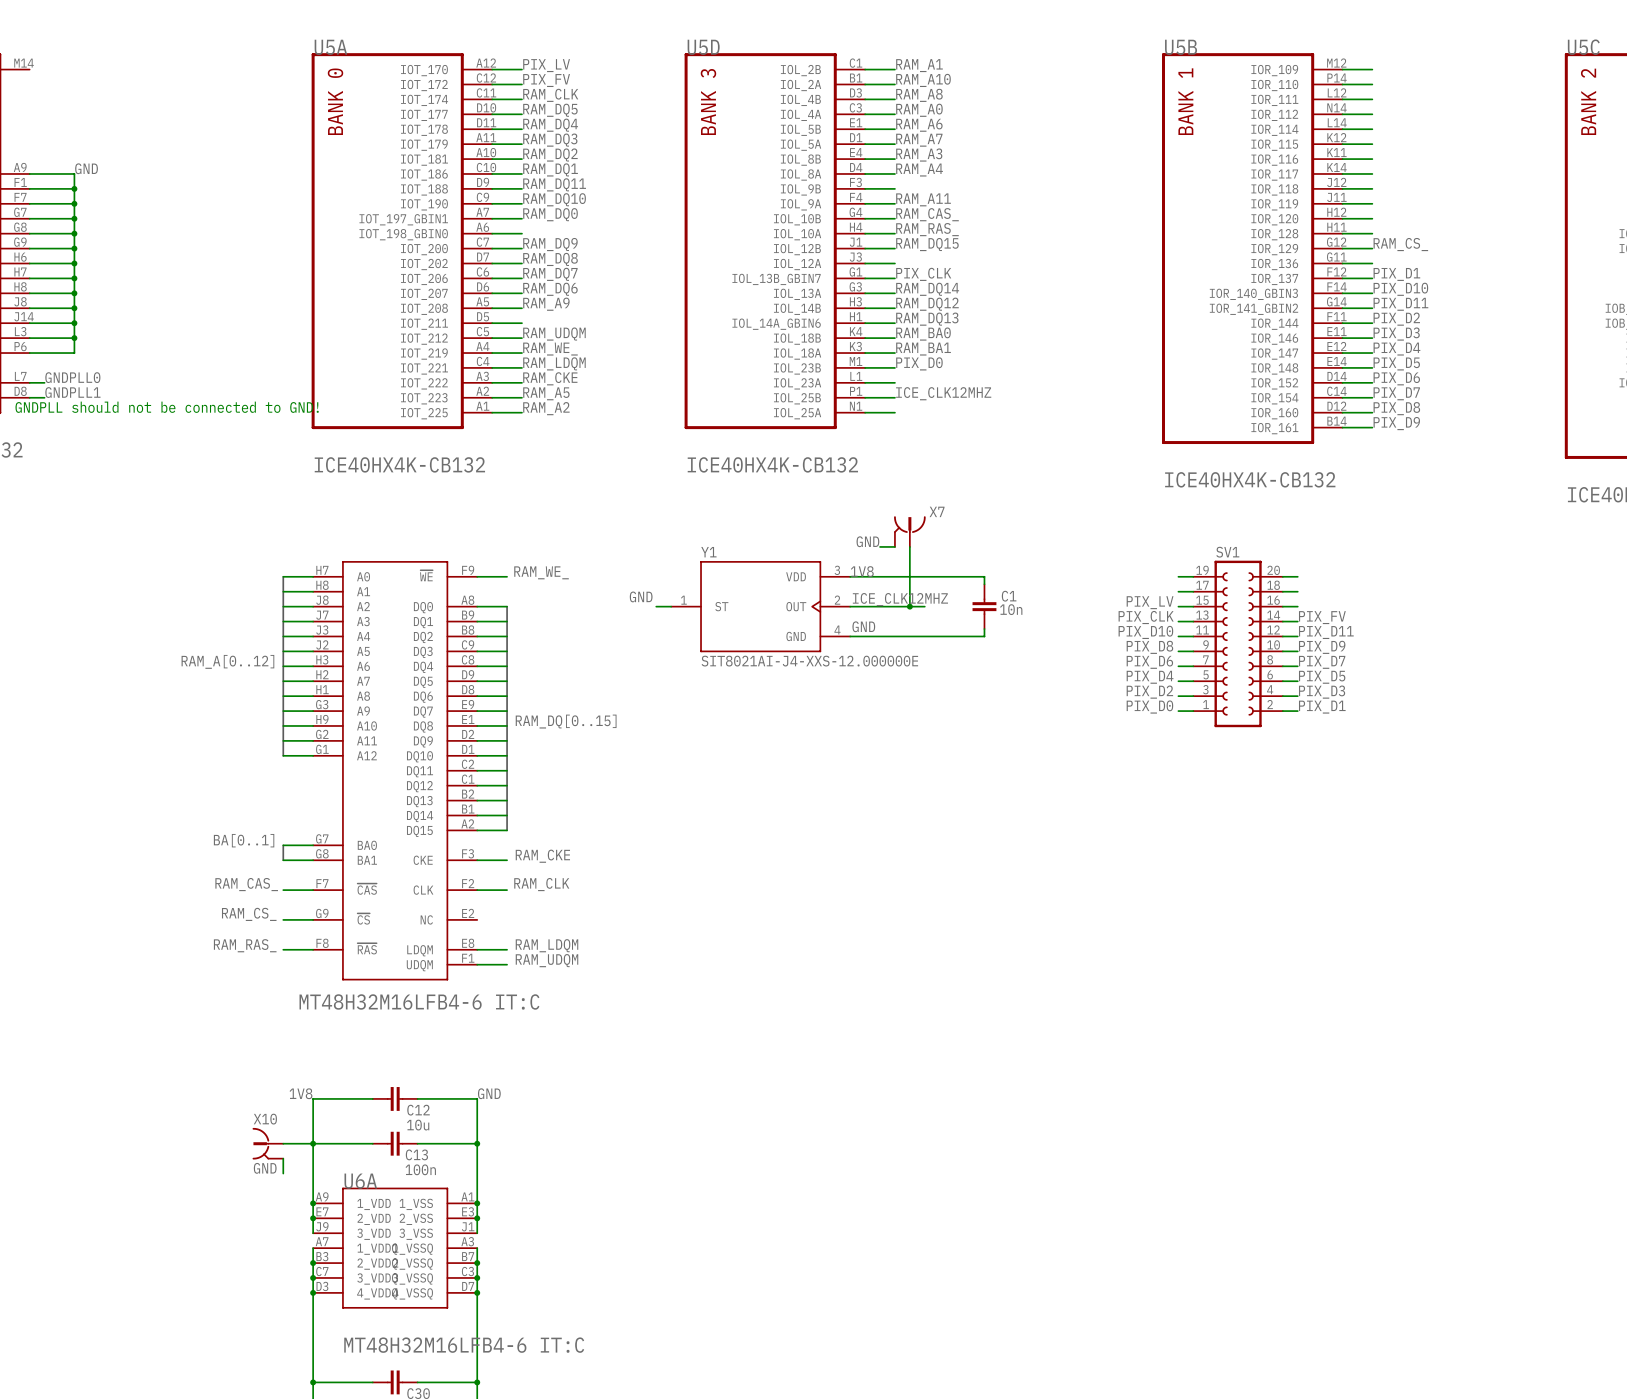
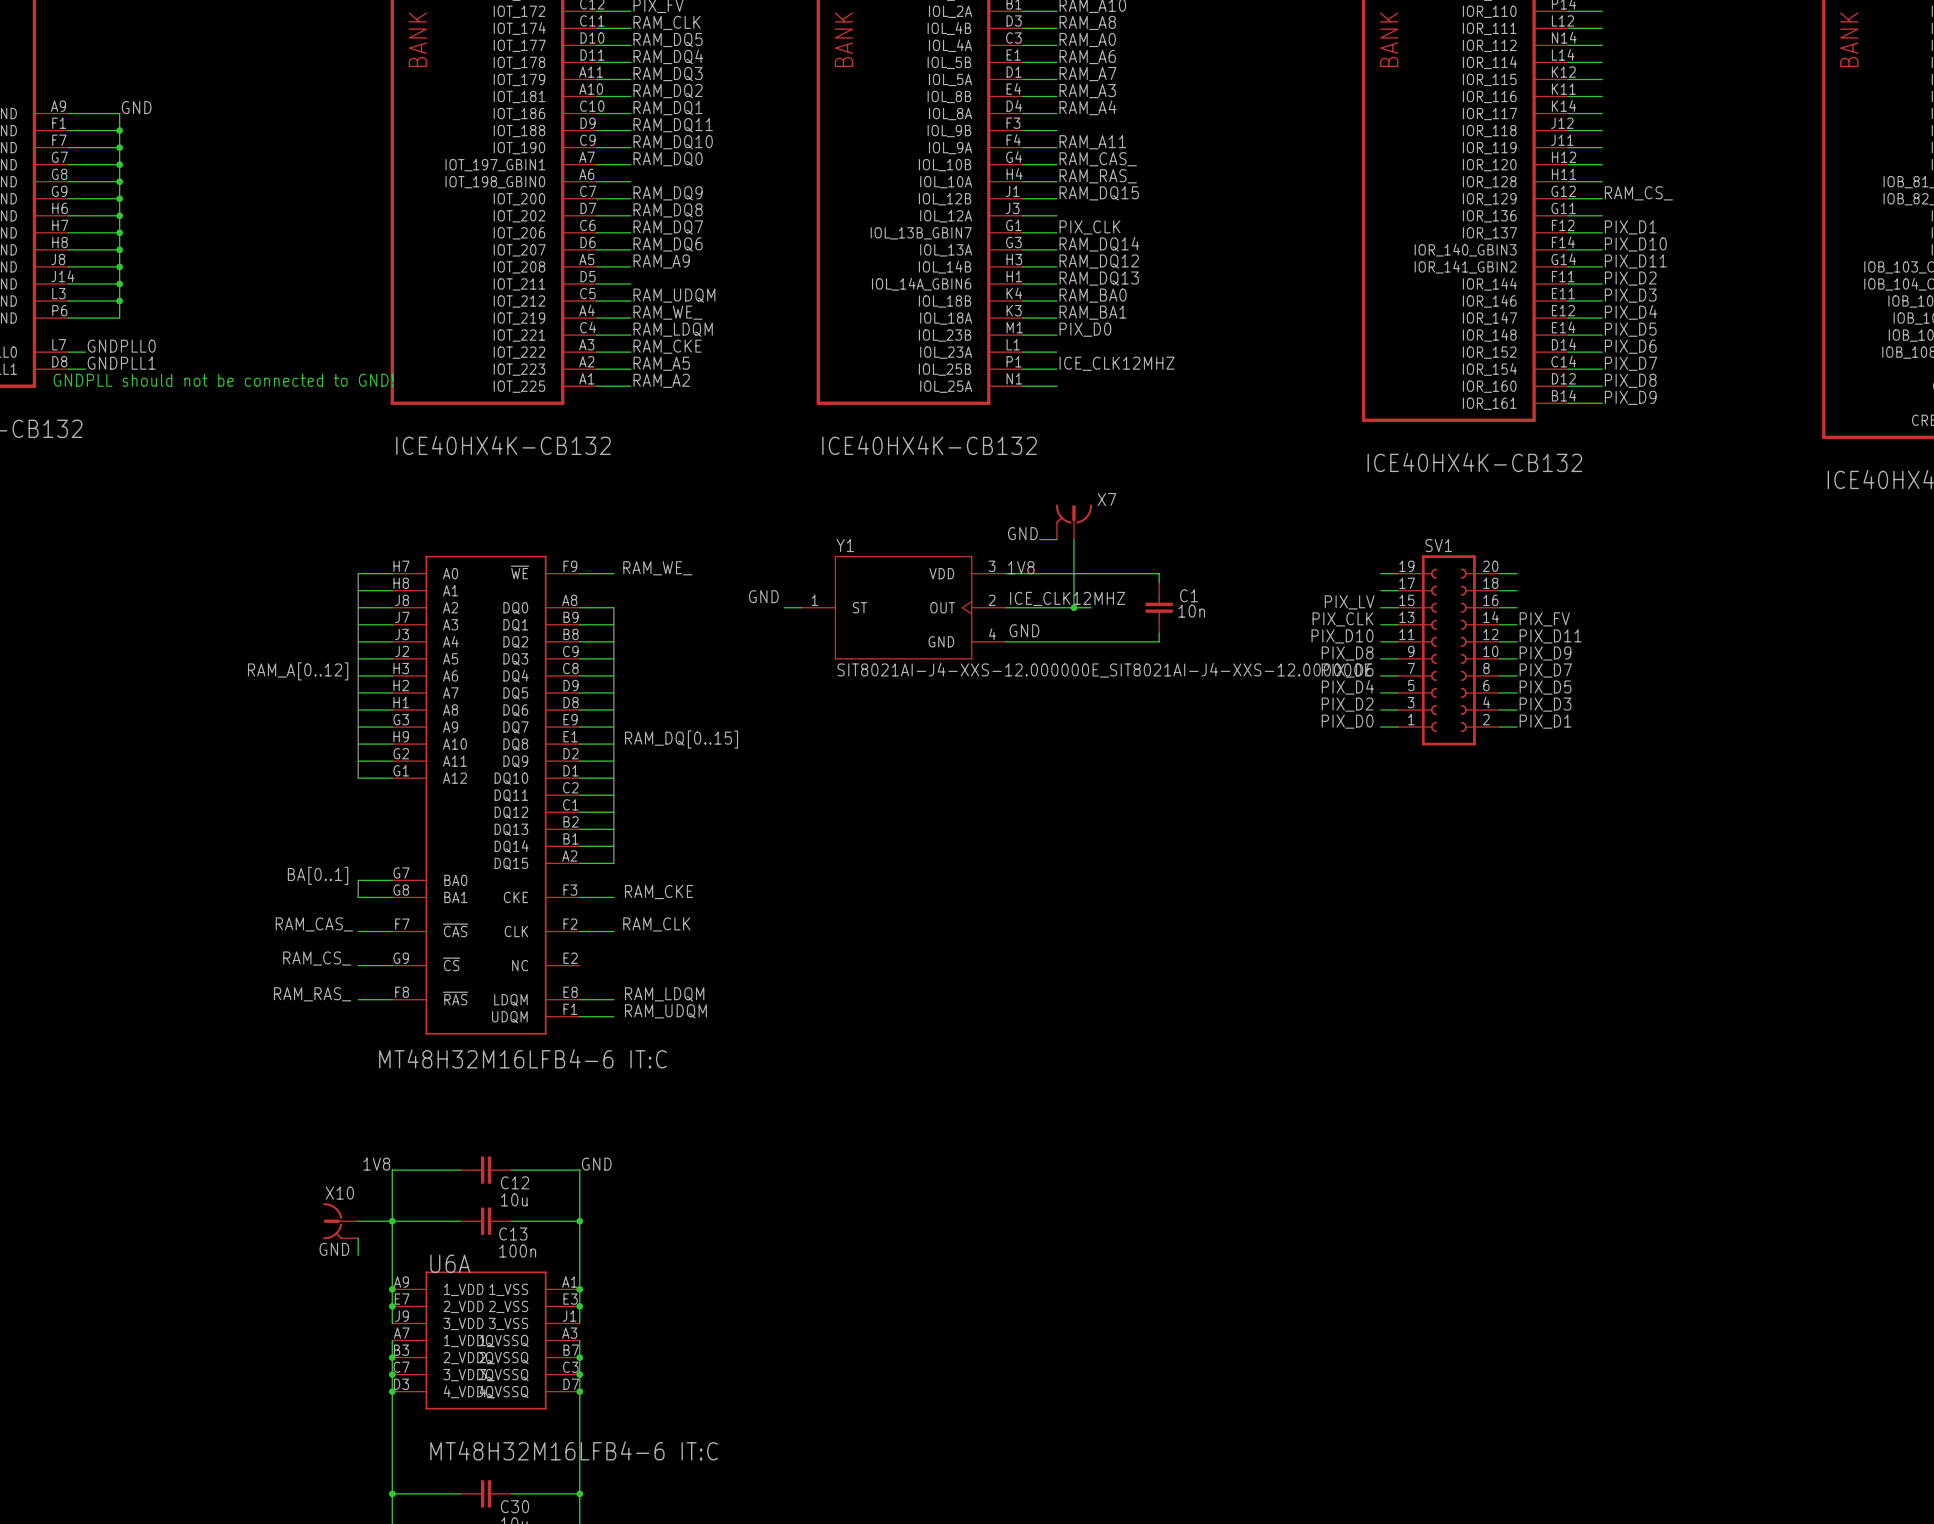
Y1 value: SIT8021AI-J4-XXS-12.000000E (809, 661) -> SIT8021AI-J4-XXS-12.000000E_SIT8021AI-J4-XXS-12.000000E (1104, 670)

